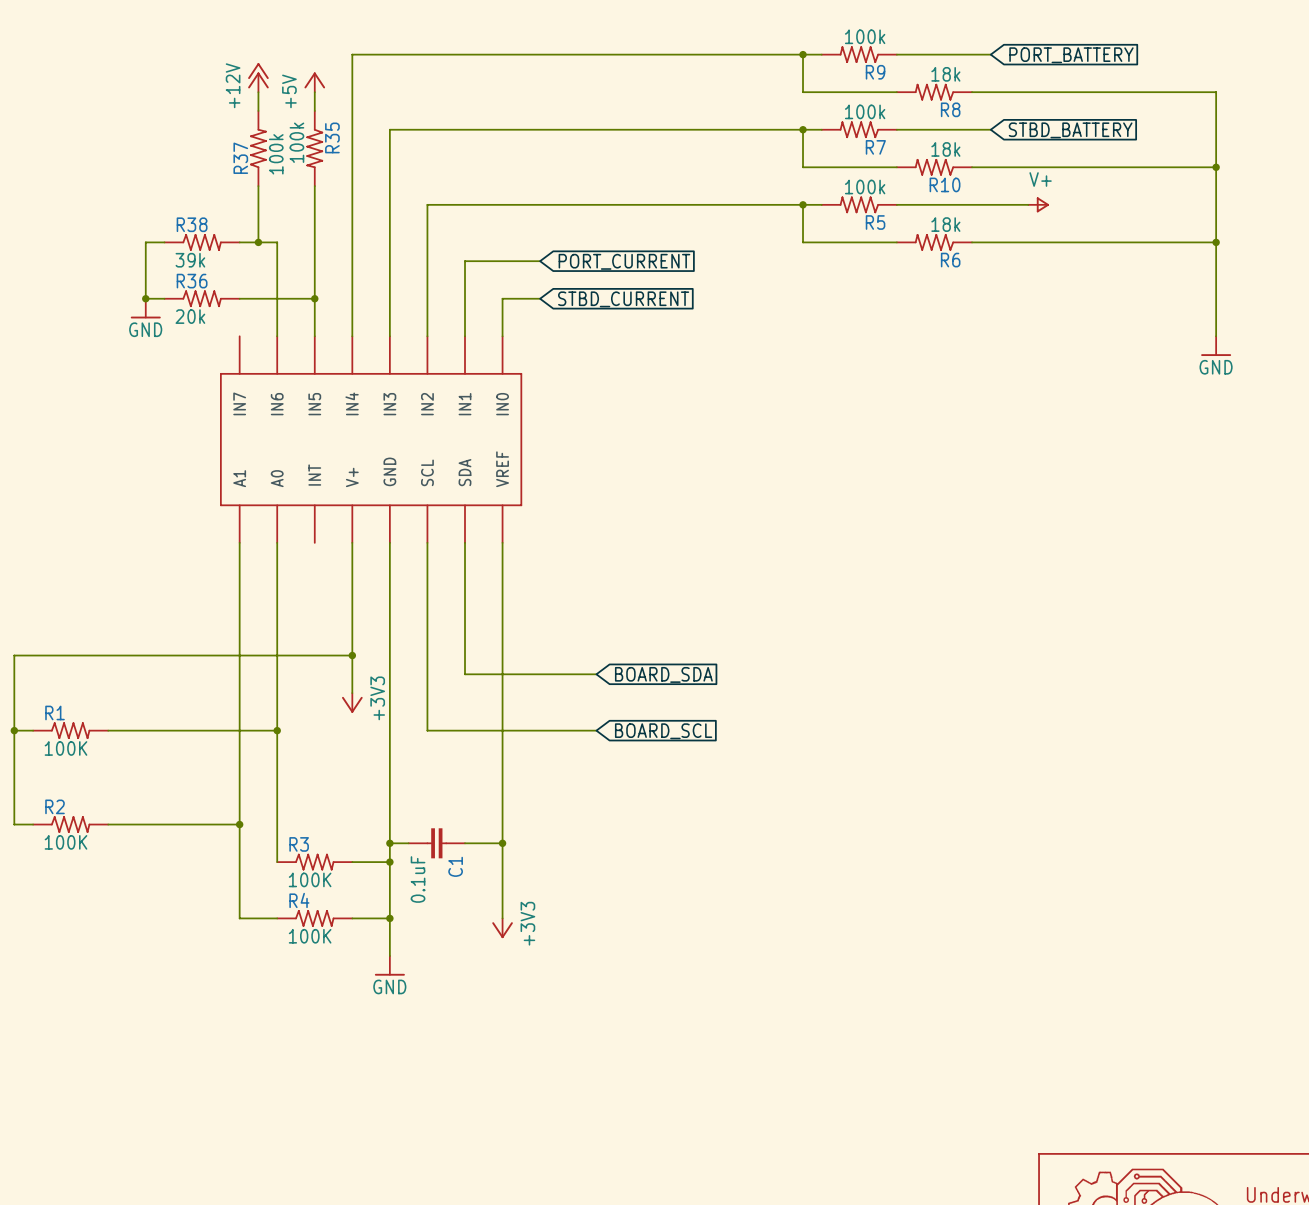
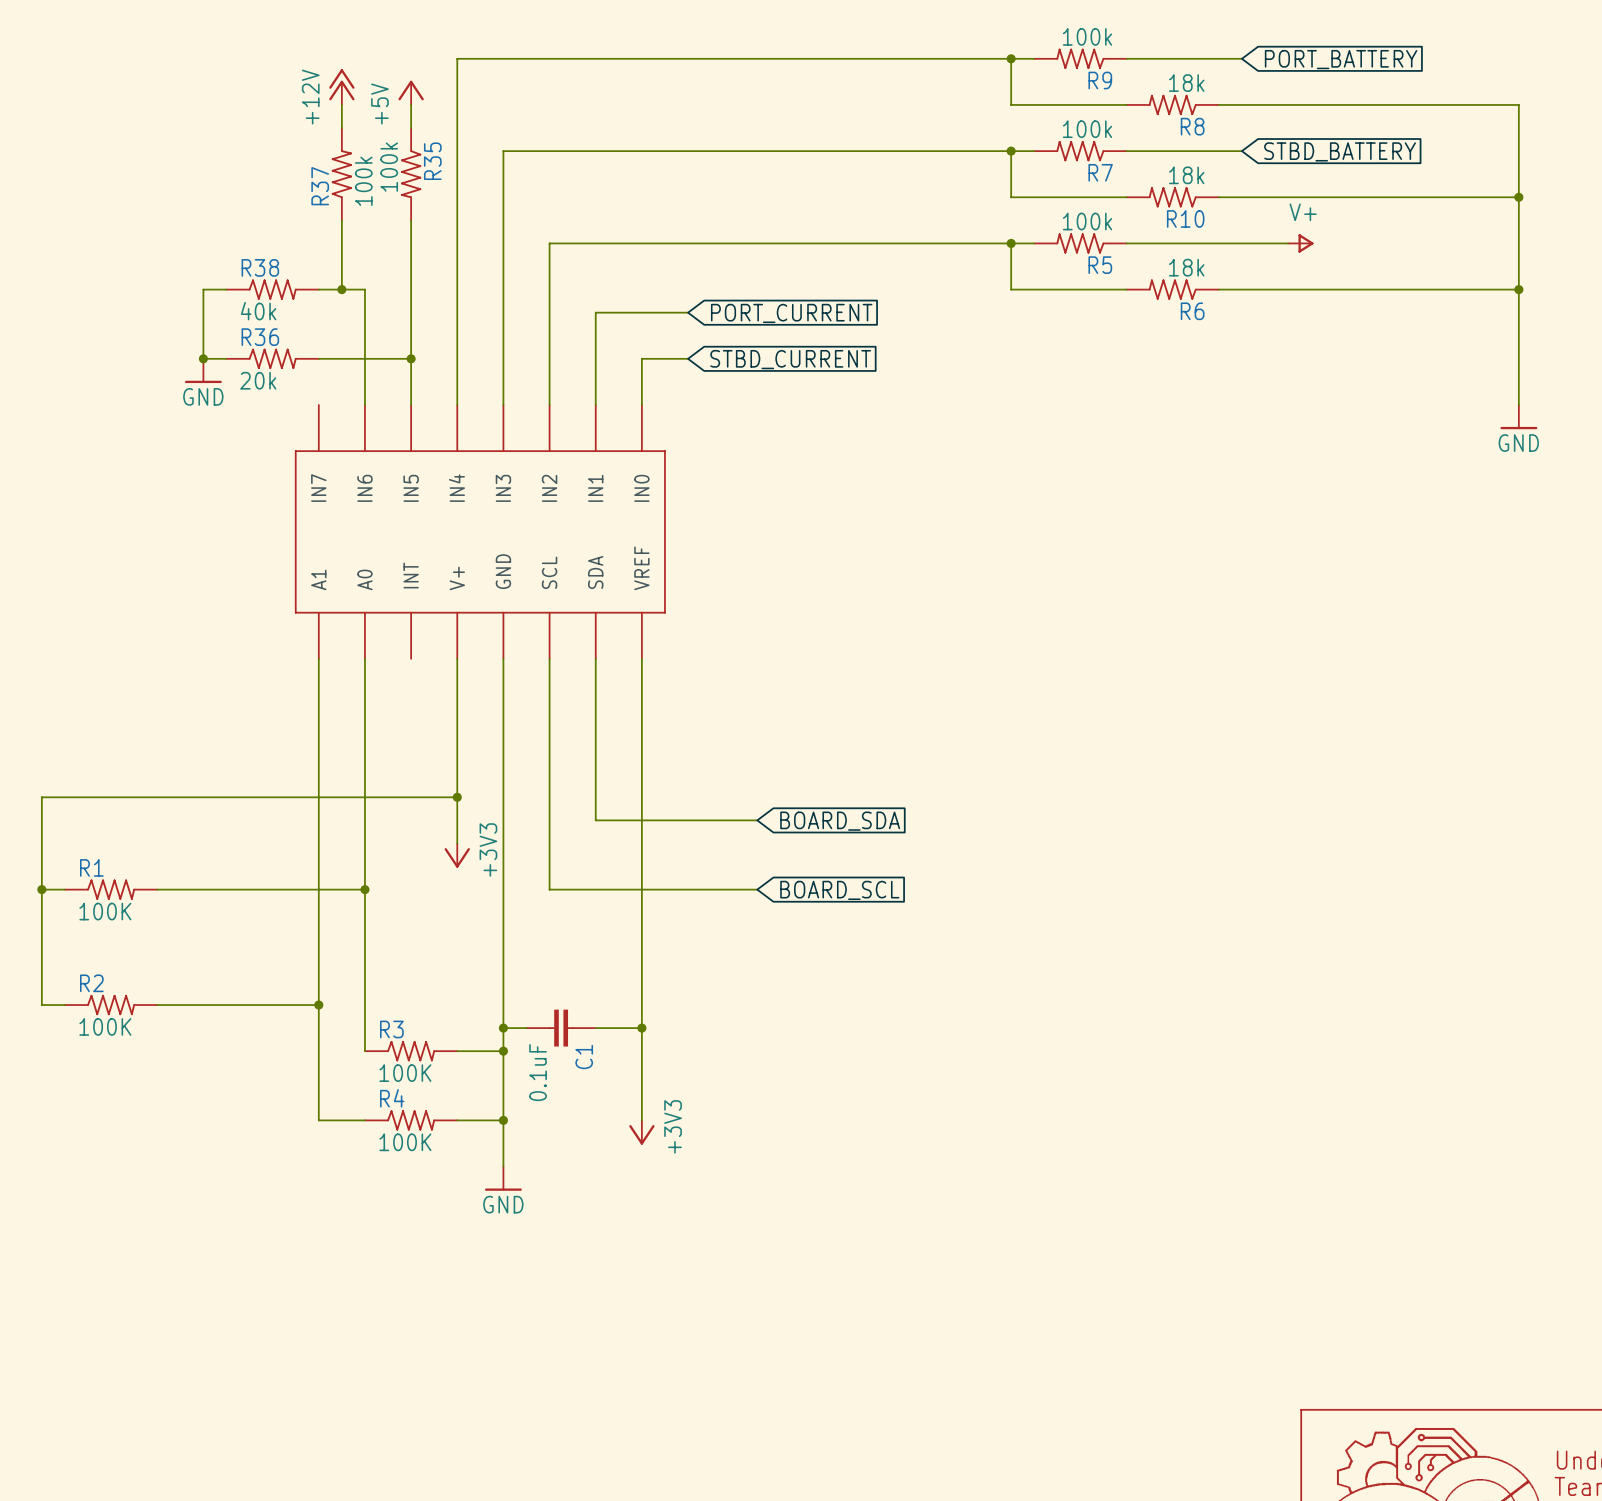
R38 value: 39k (190, 260) -> 40k (258, 311)

